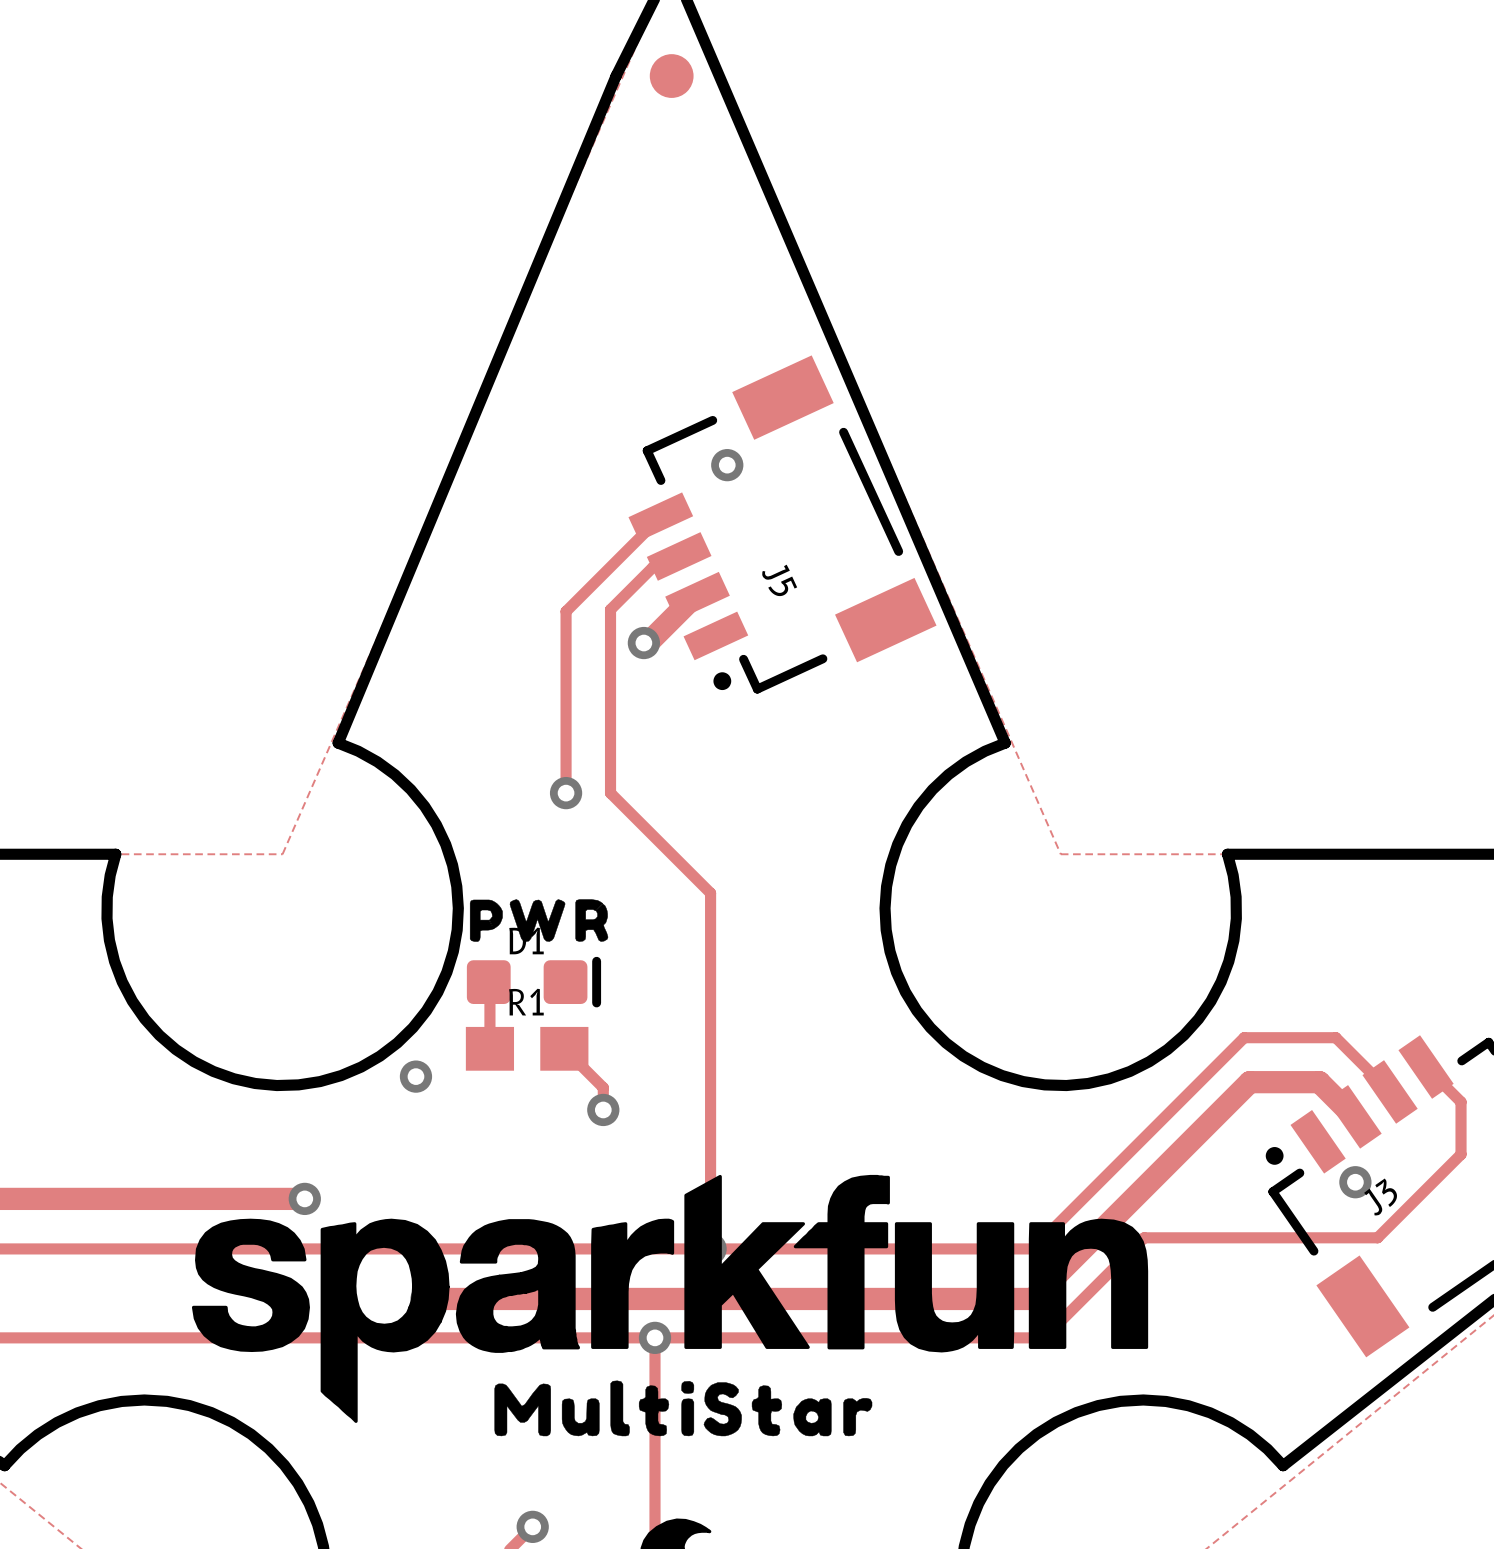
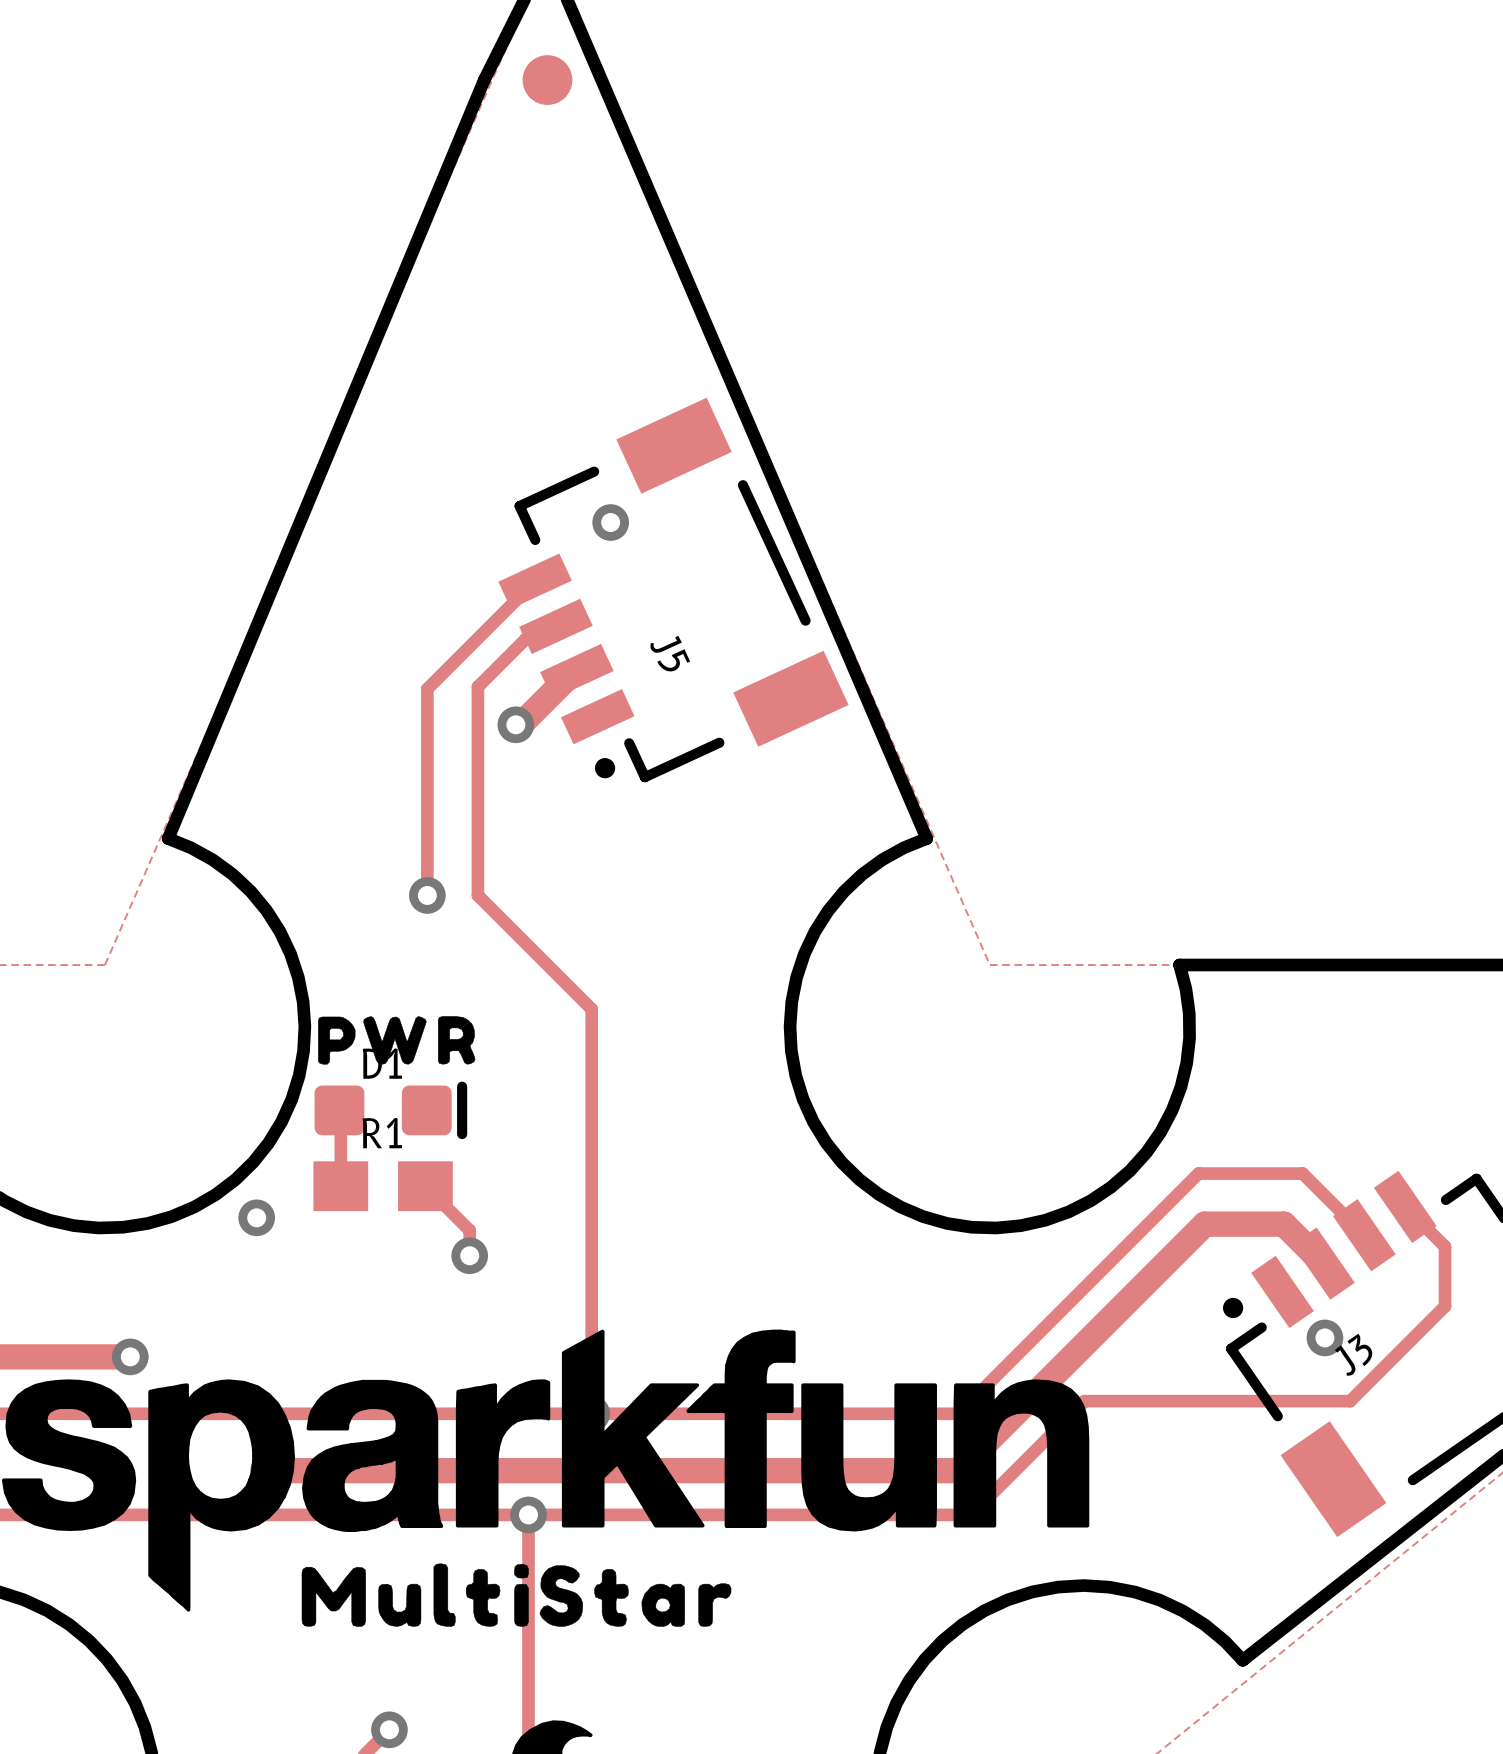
drawing position: (683, 1408) -> (516, 1595)

